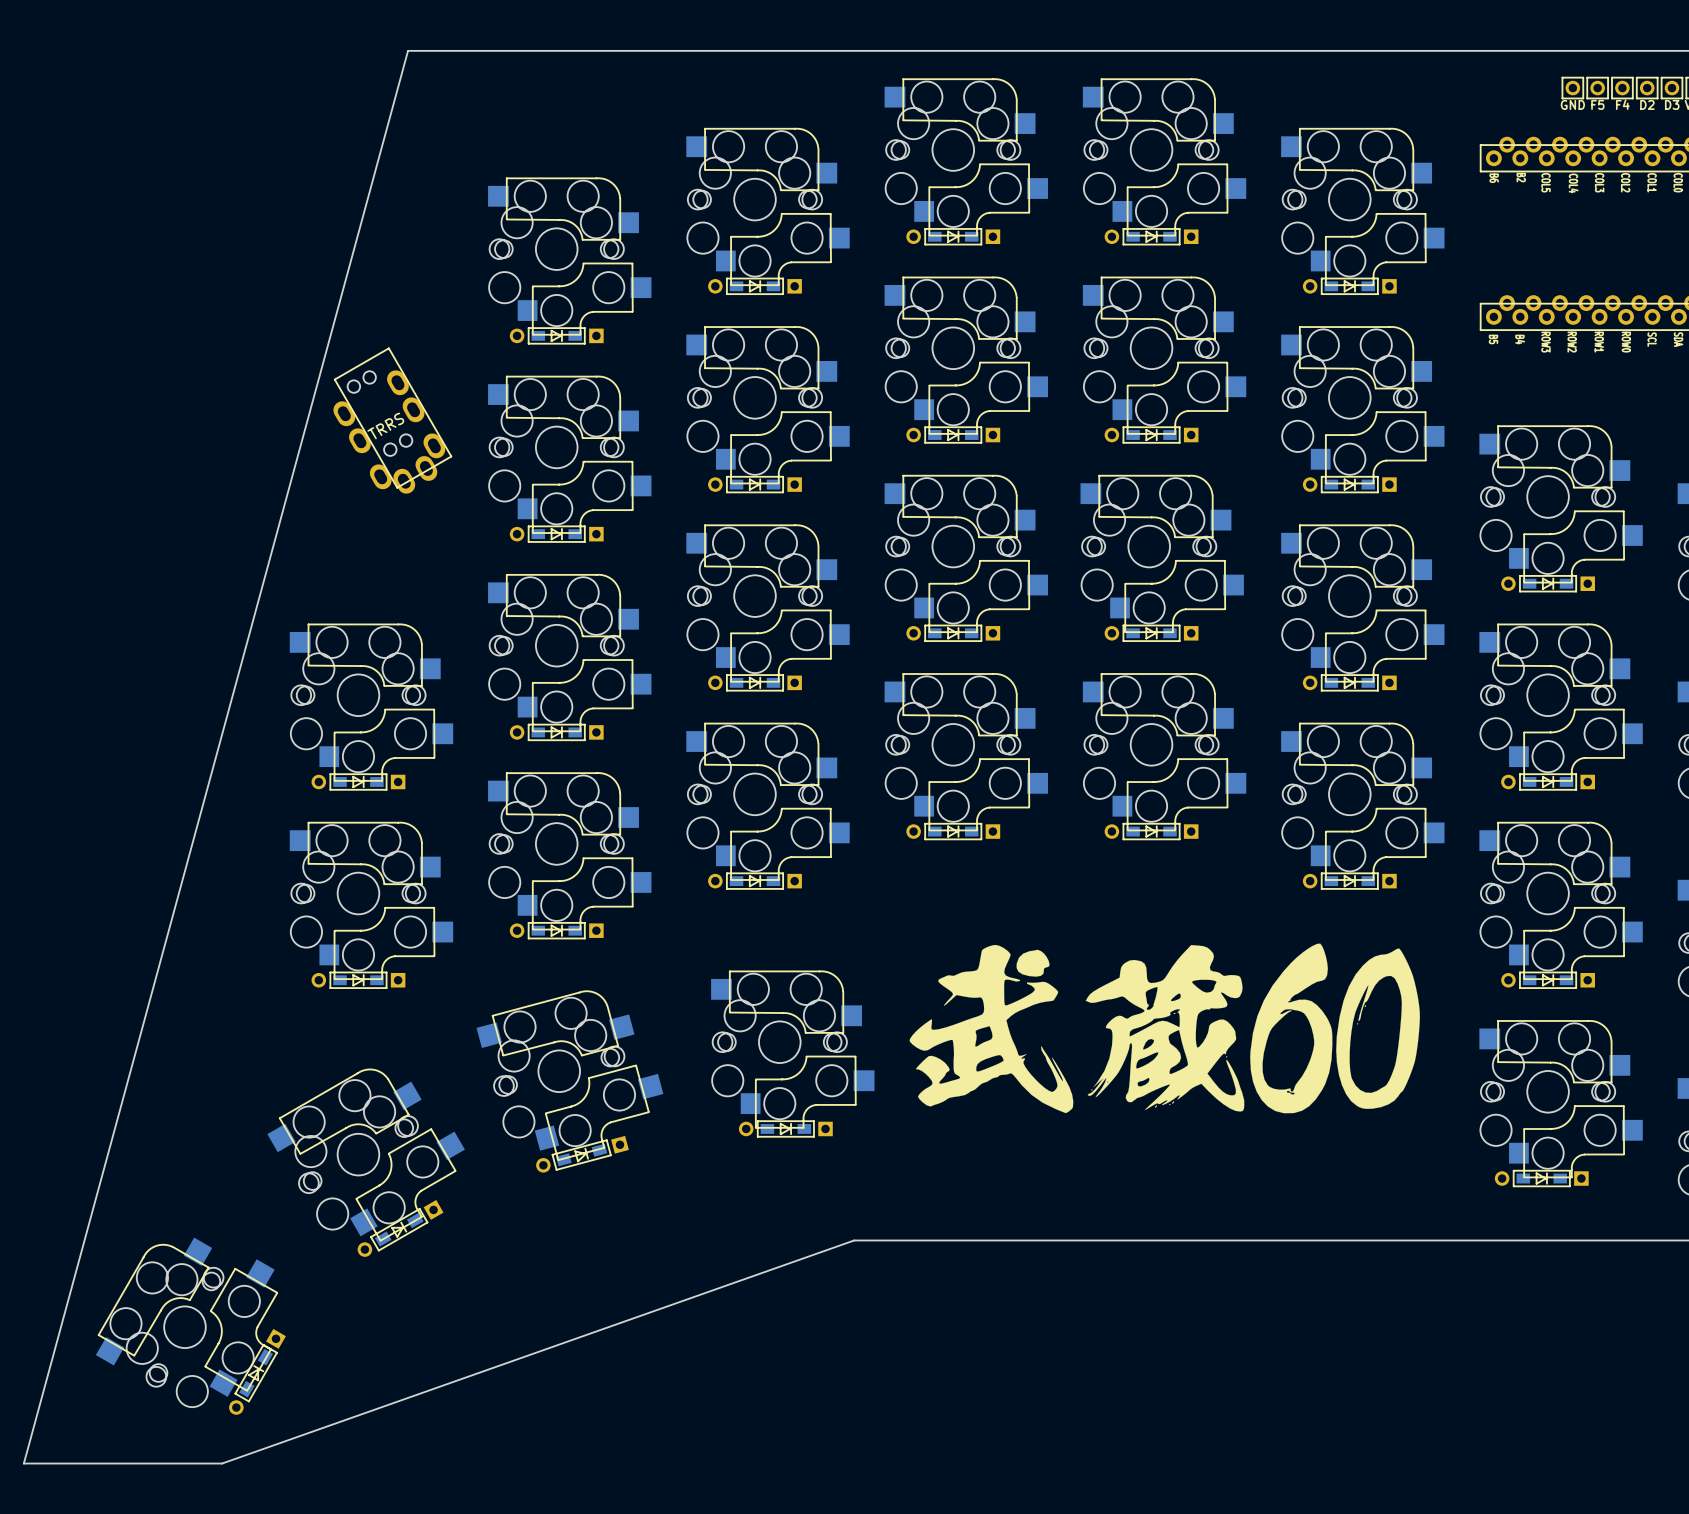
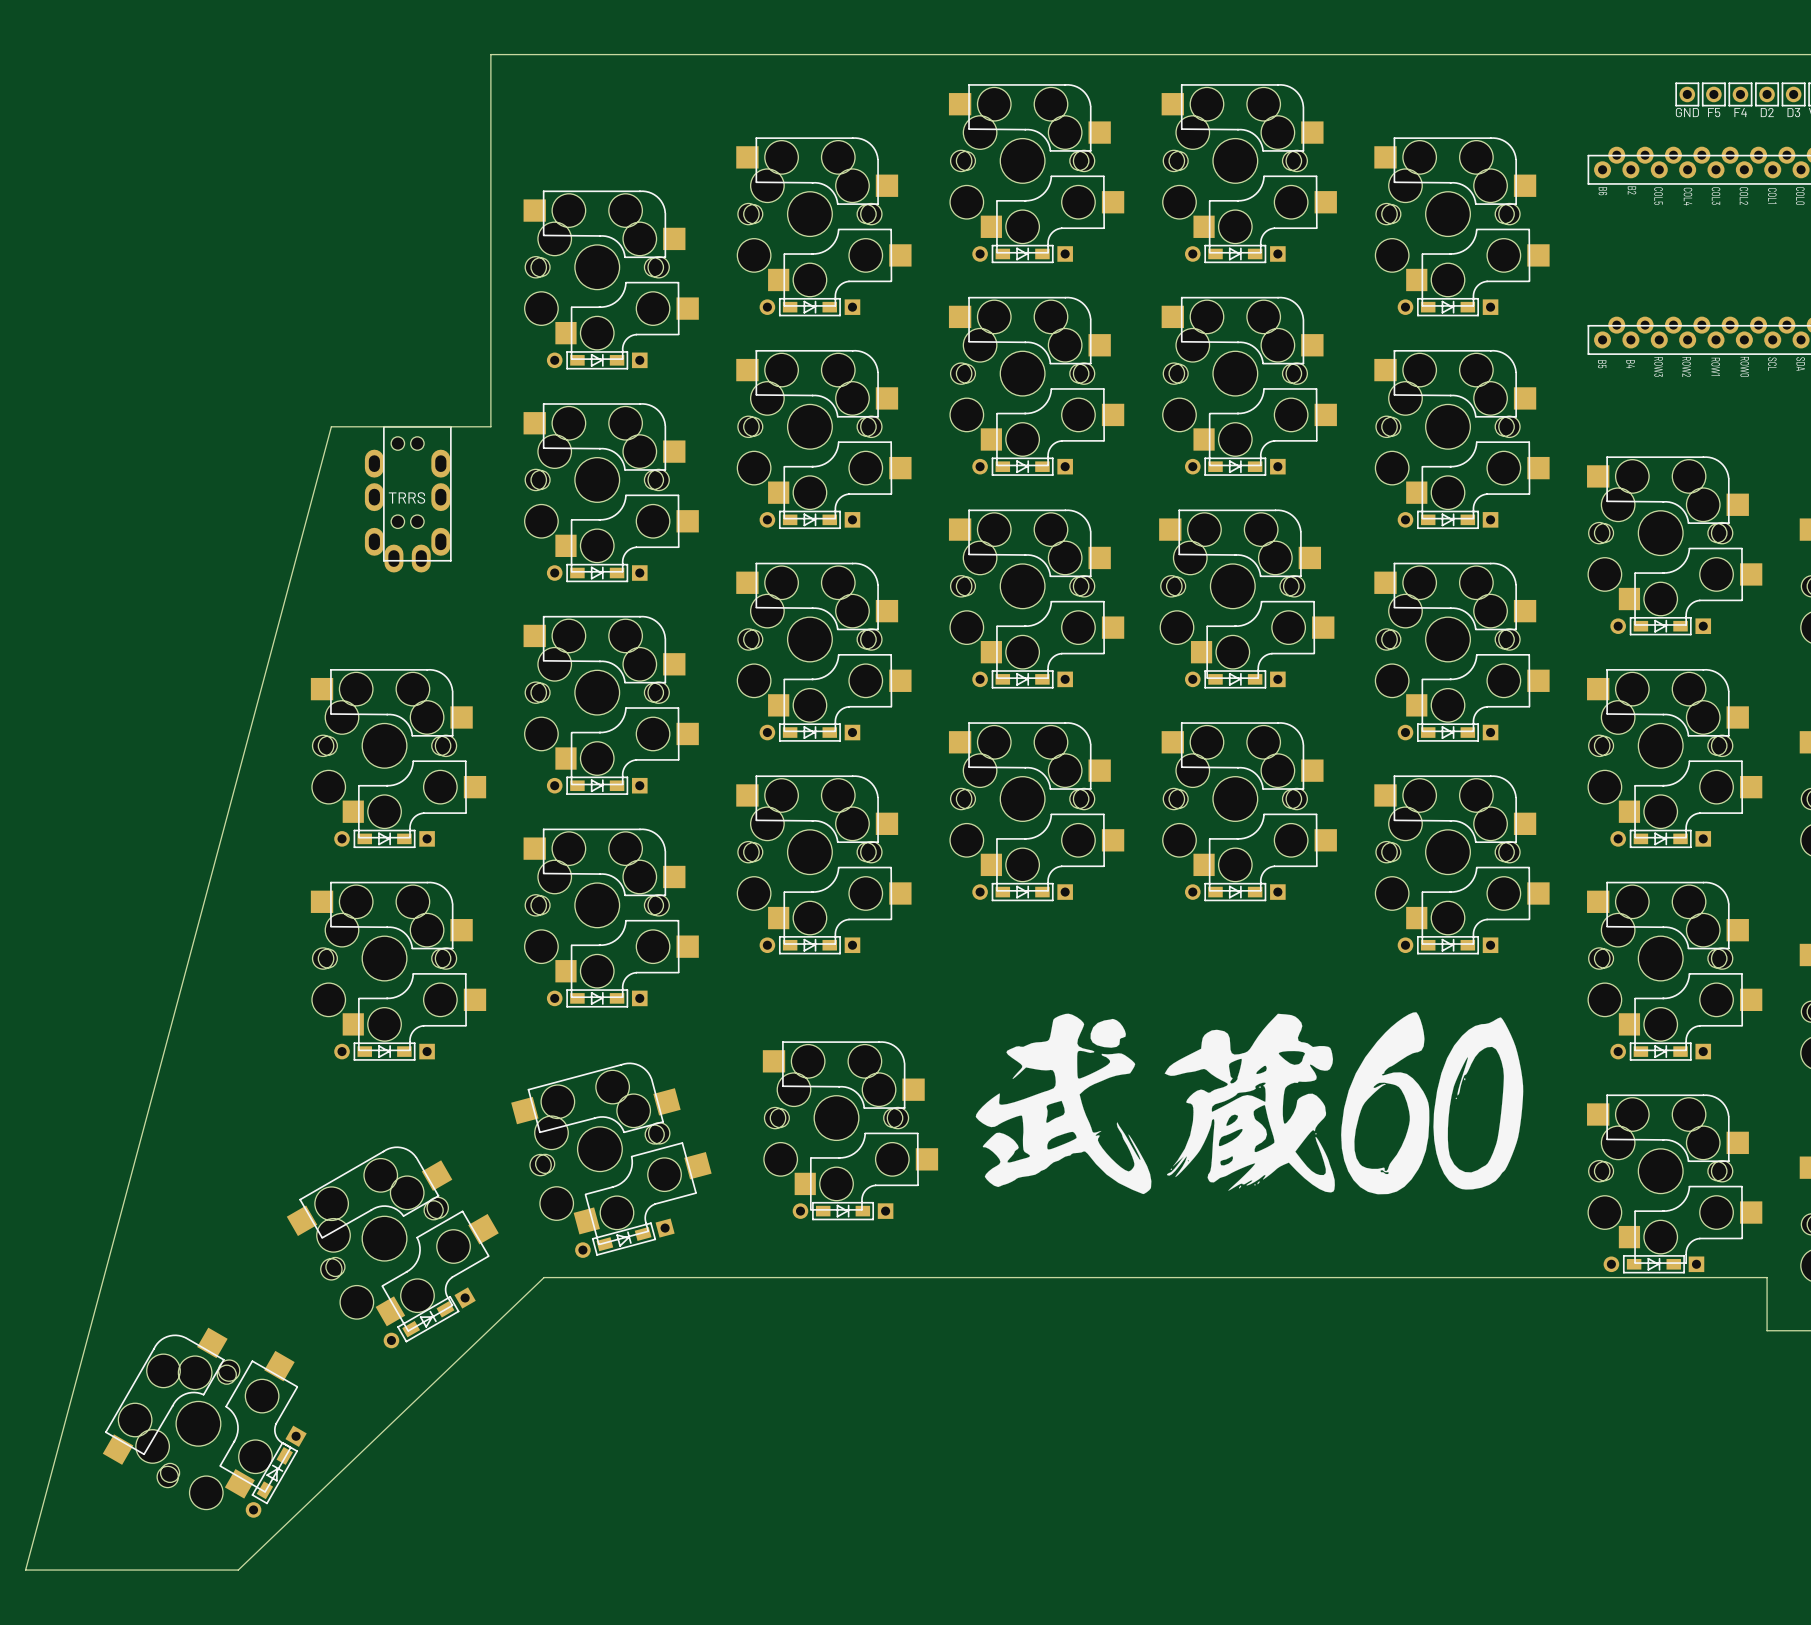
board edge: (457, 50) (408, 50) (23, 1463) -> (490, 54) (490, 426) (331, 426) (25, 1570)
part: (392, 420) -> none
part: none -> (408, 499)
board edge: (1647, 1240) (854, 1240) (222, 1463) -> (1767, 1330) (1767, 1277) (544, 1277) (238, 1570)

